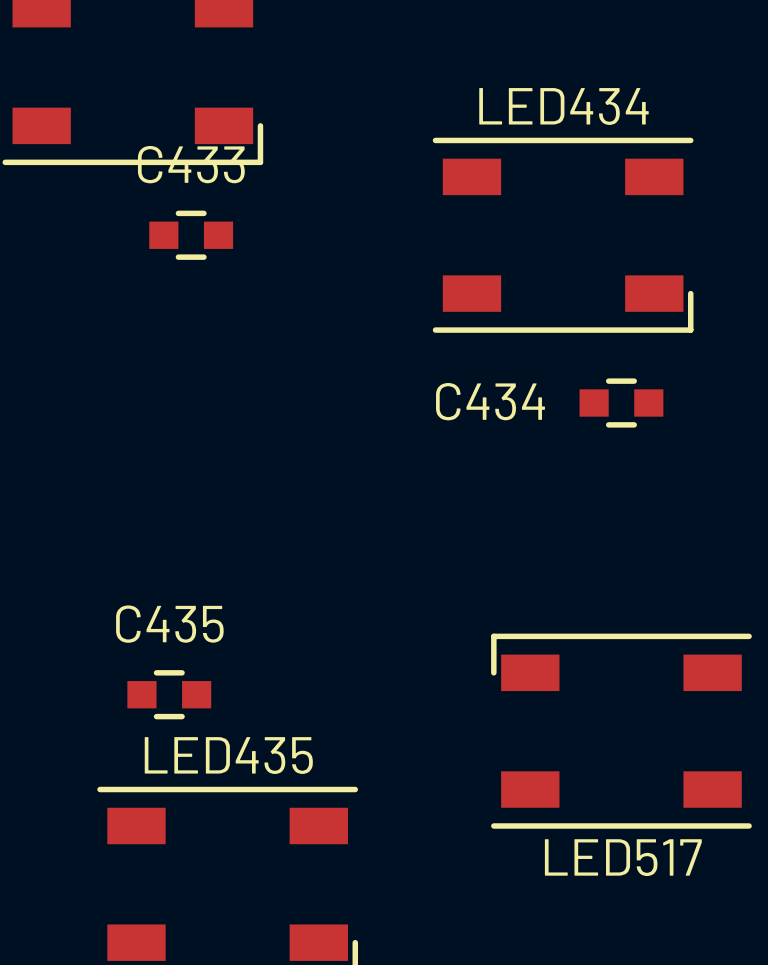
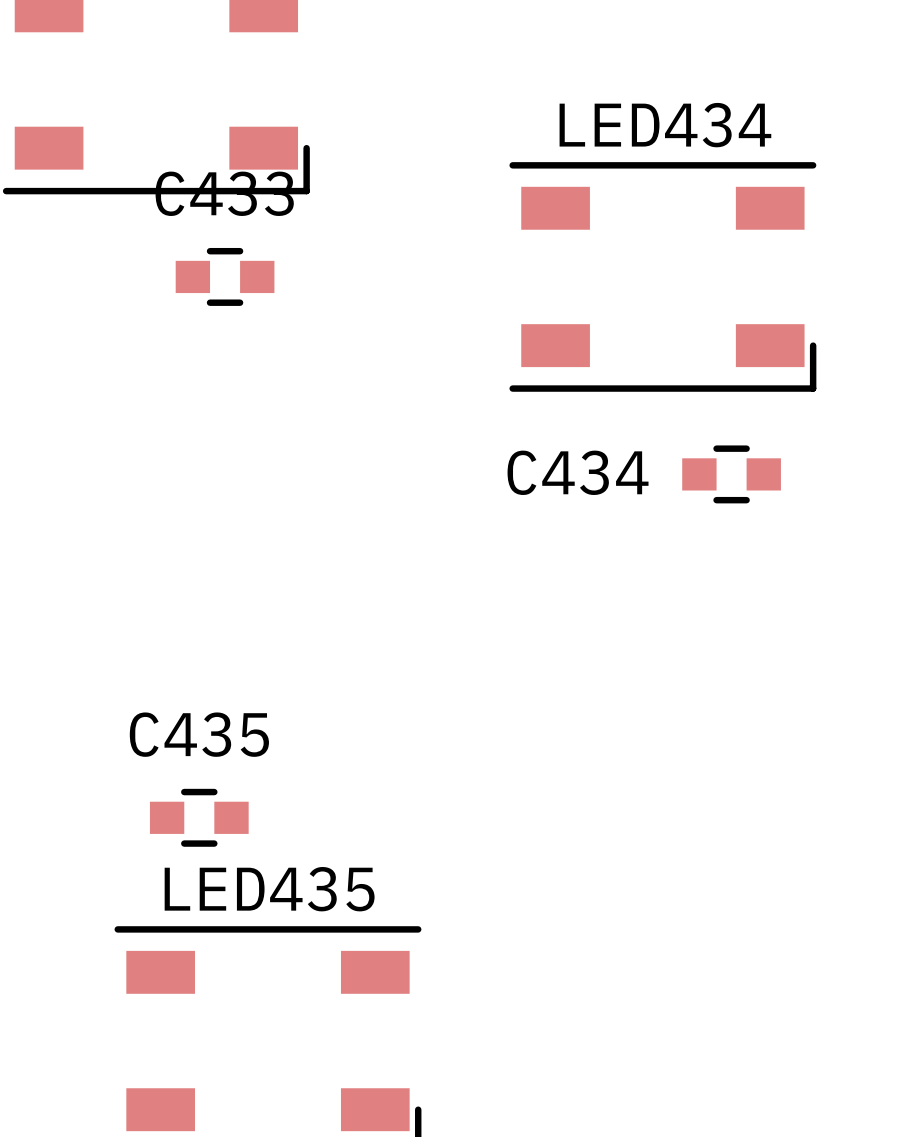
LED517: (621, 731) -> none

